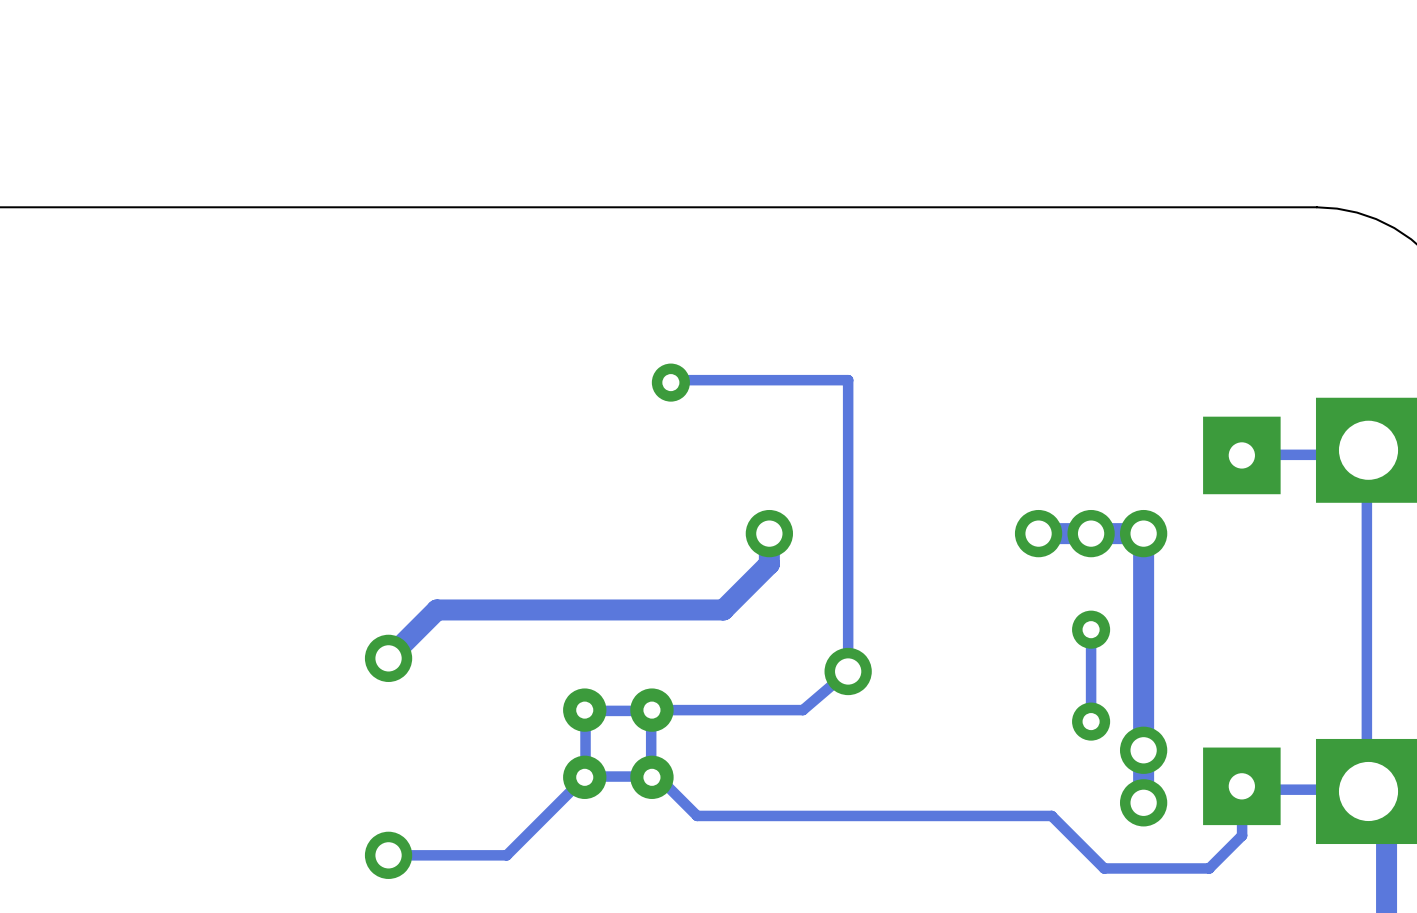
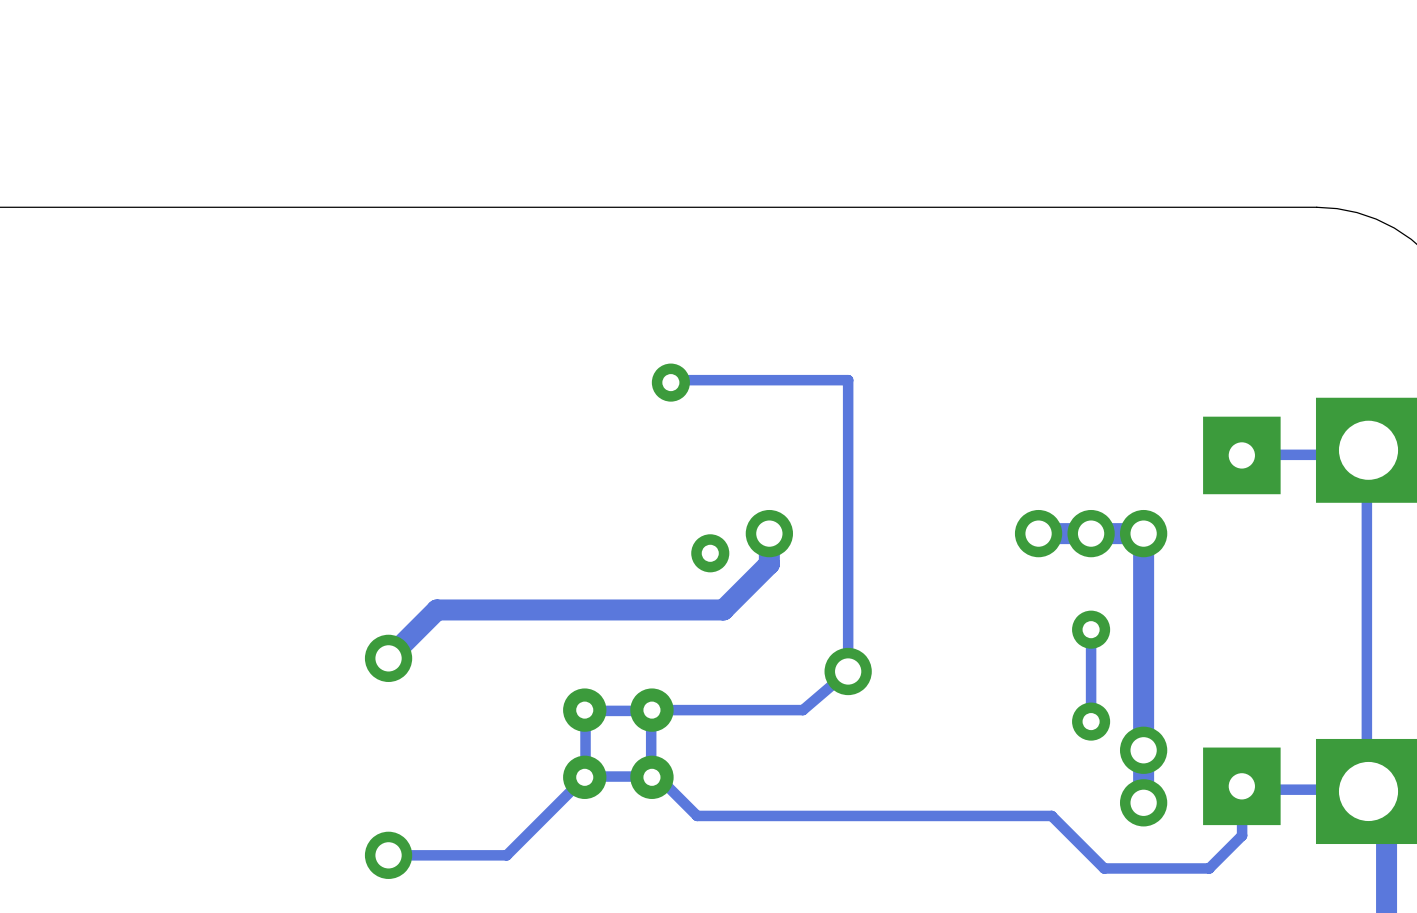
via: none -> (710, 553)

